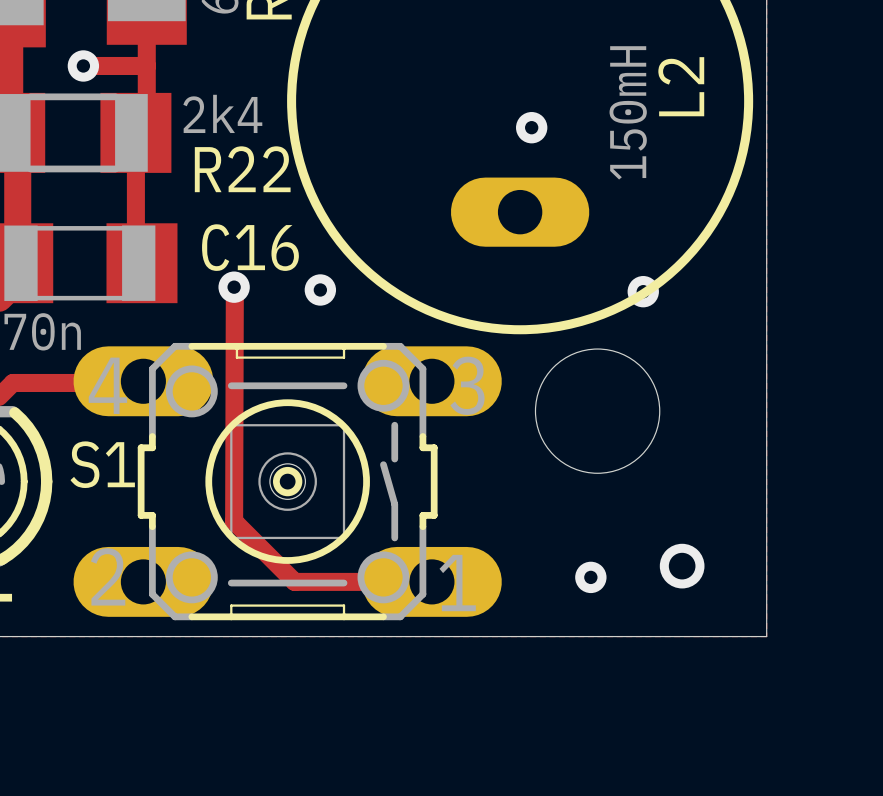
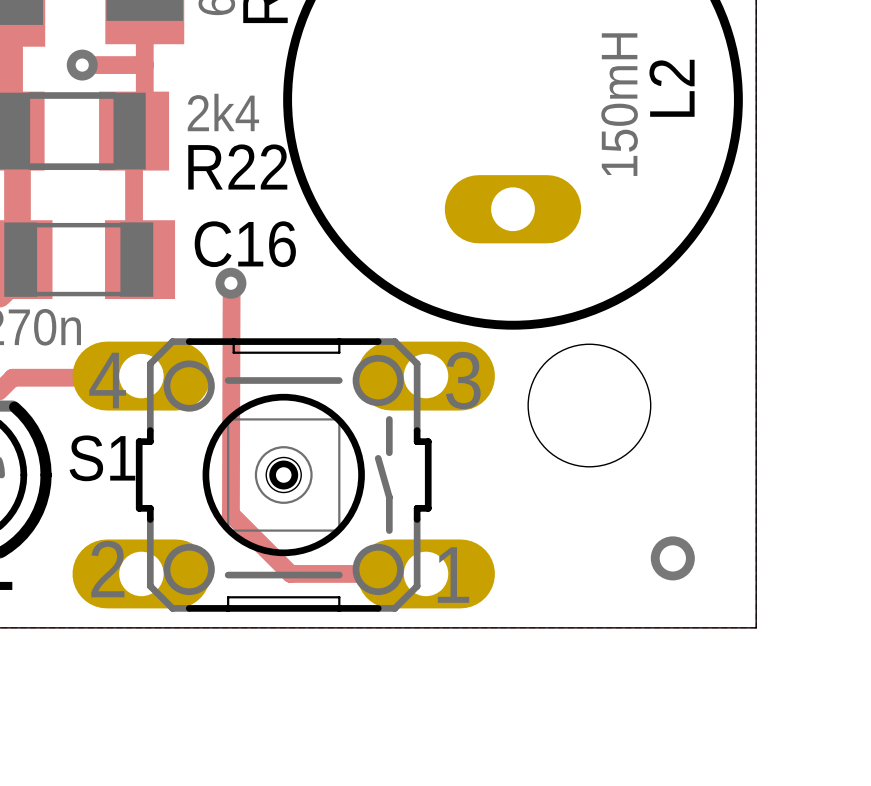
via: (531, 127) -> none
via: (320, 289) -> none
via: (643, 291) -> none
via: (590, 577) -> none

